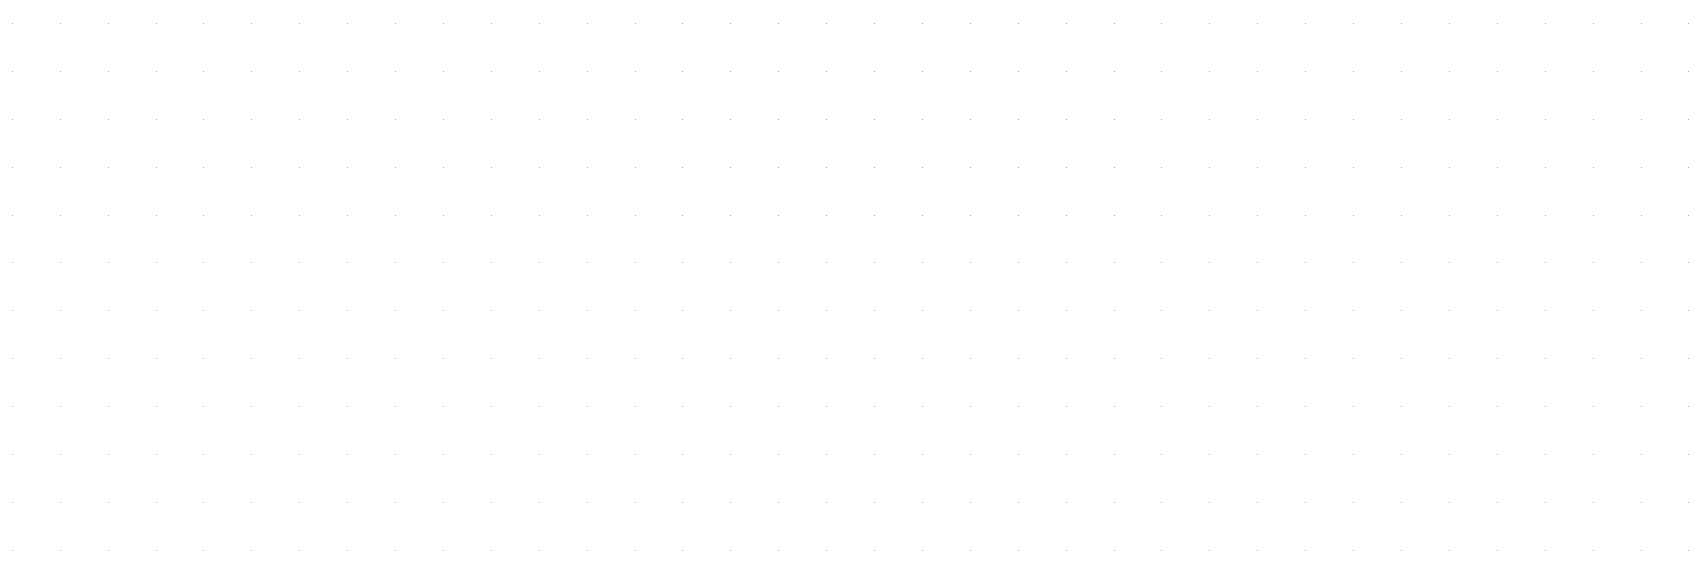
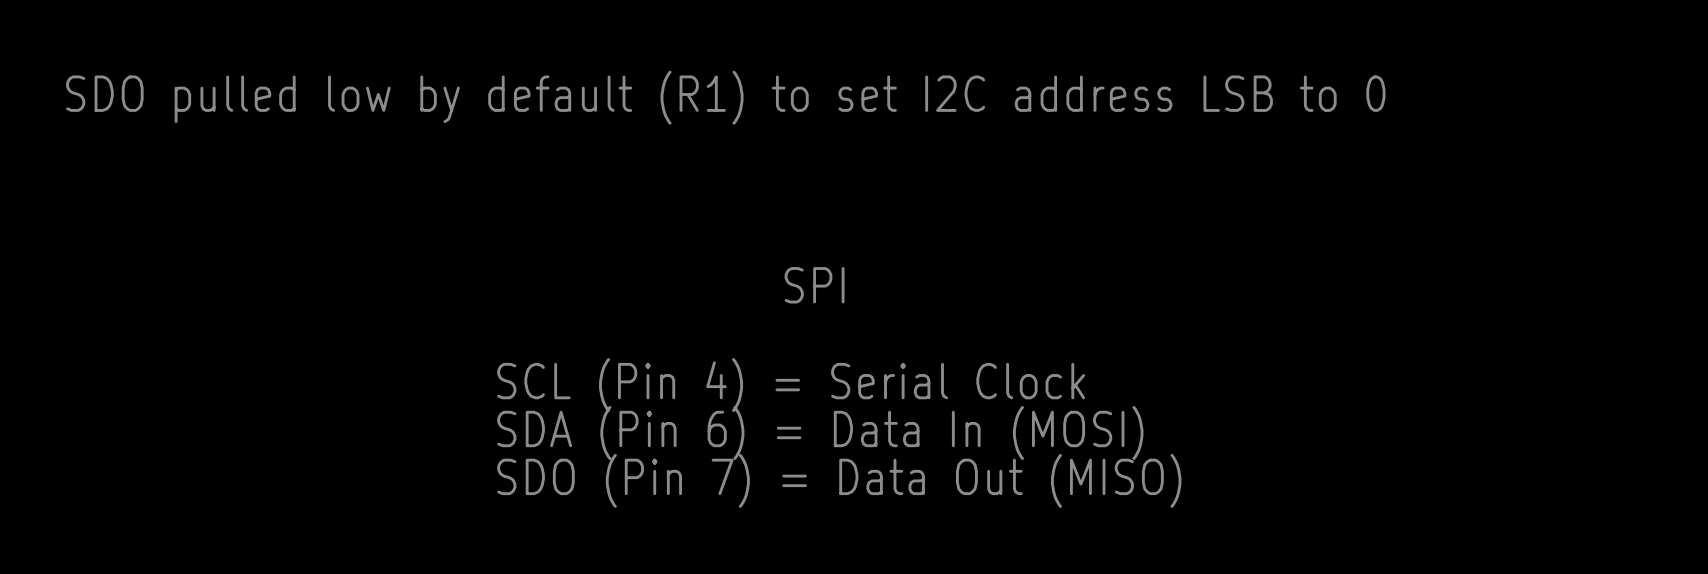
text: none -> SDO pulled low by default (R1) to set I2C address LSB to 0 (725, 97)
text: none -> SPI (814, 285)
text: none -> SCL (Pin 4) = Serial Clock (791, 385)
text: none -> SDA (Pin 6) = Data In (MOSI) (820, 432)
text: none -> SDO (Pin 7) = Data Out (MISO) (839, 480)

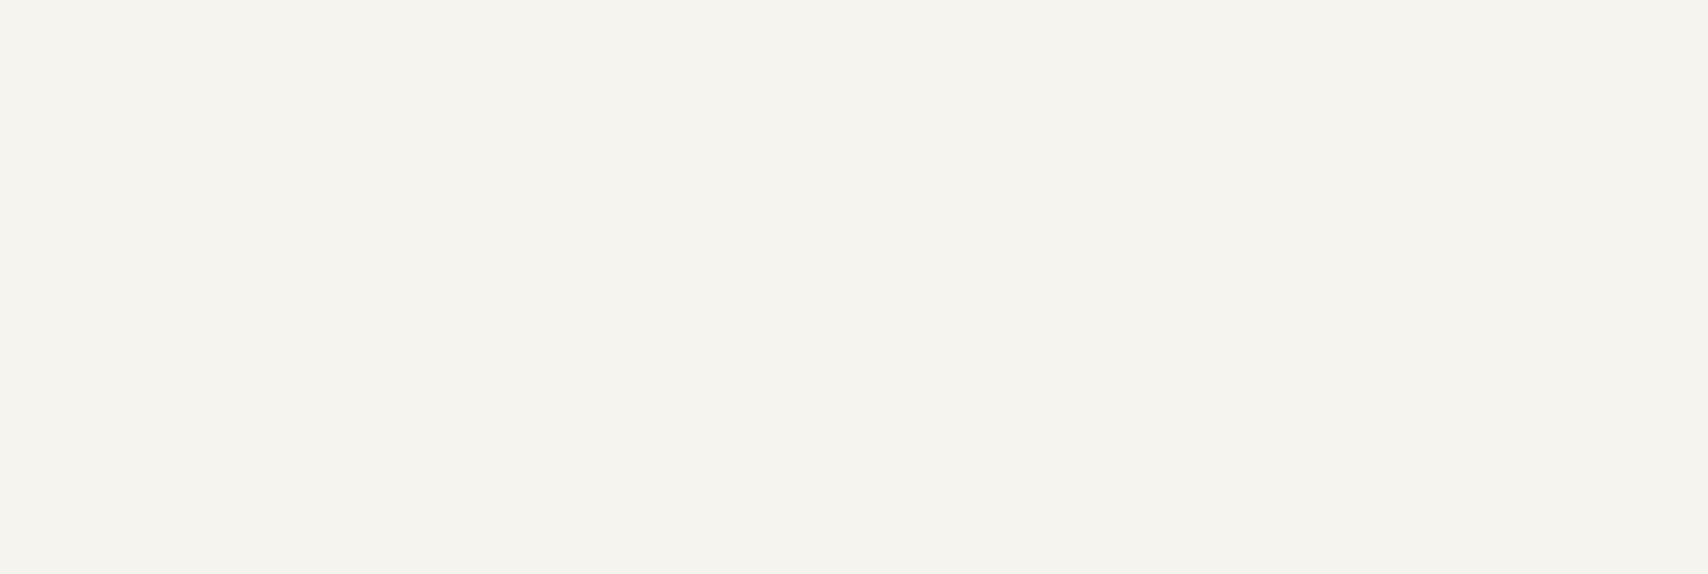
text: SDO pulled low by default (R1) to set I2C address LSB to 0 (725, 97) -> none
text: SPI (814, 285) -> none
text: SCL (Pin 4) = Serial Clock (791, 385) -> none
text: SDA (Pin 6) = Data In (MOSI) (820, 432) -> none
text: SDO (Pin 7) = Data Out (MISO) (839, 480) -> none

